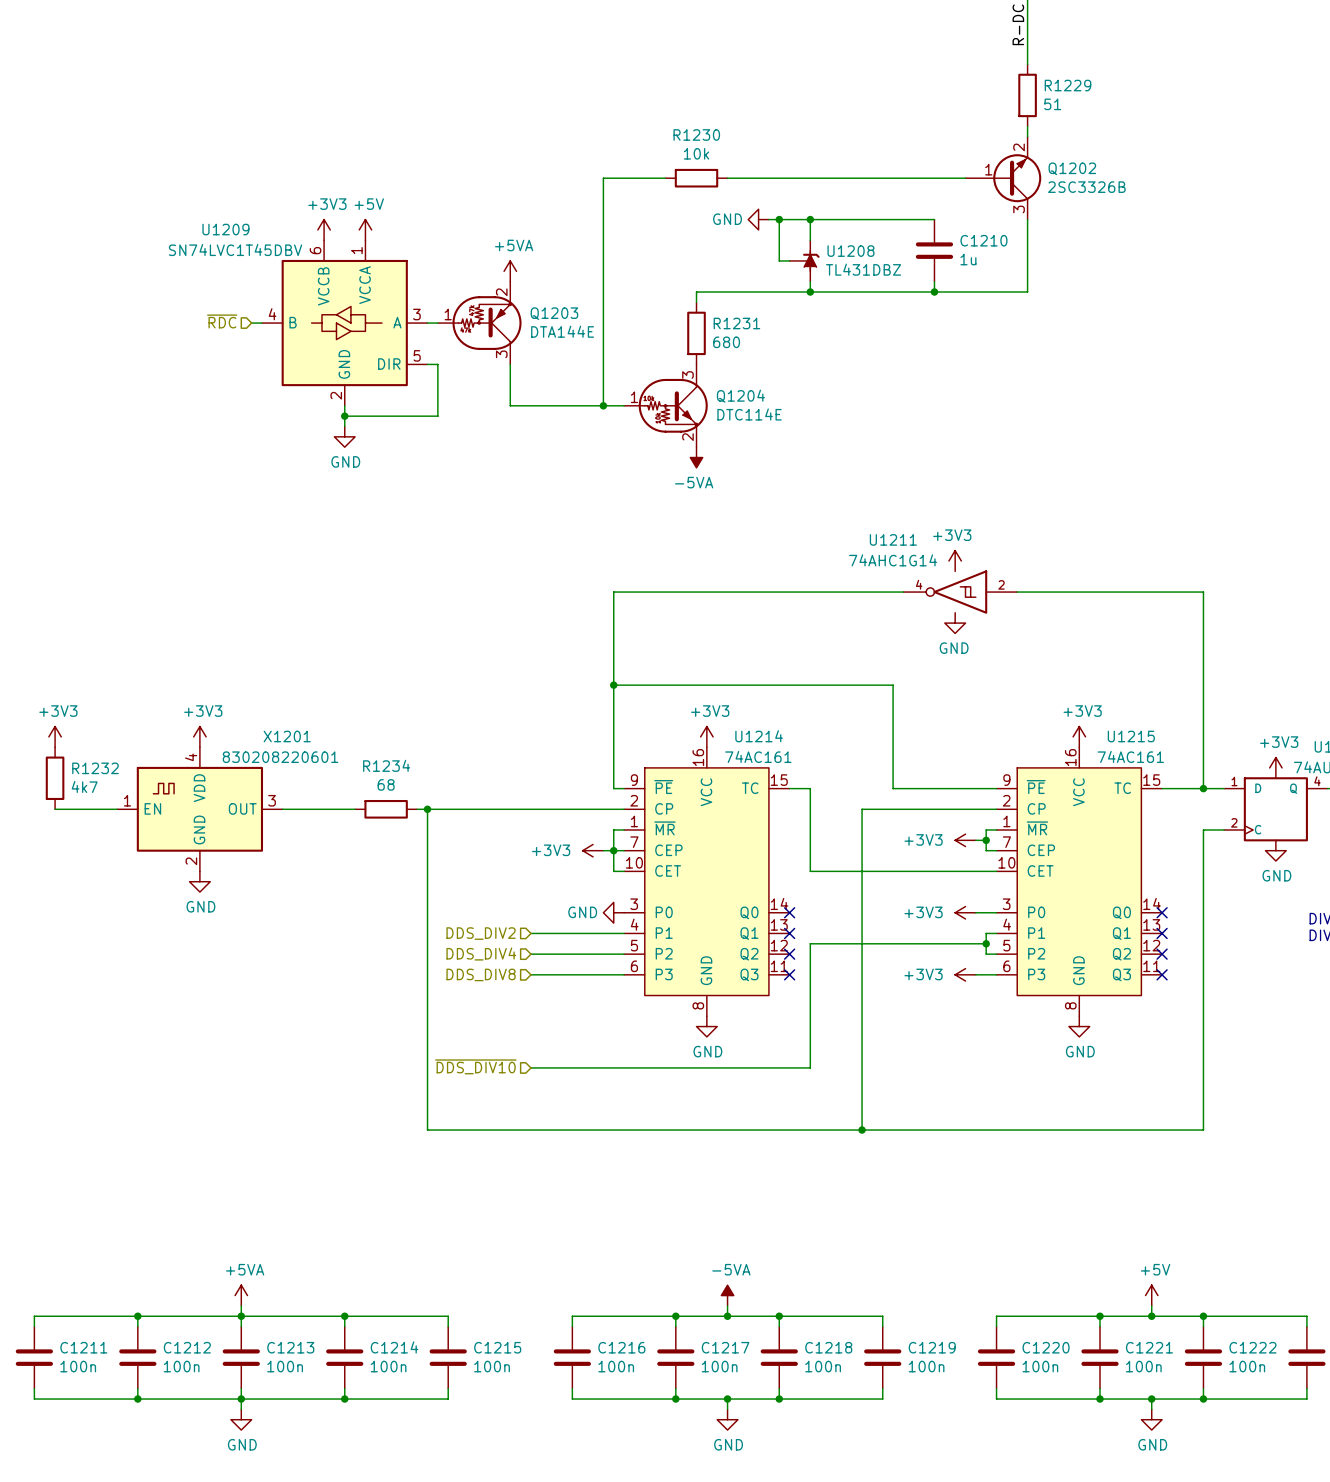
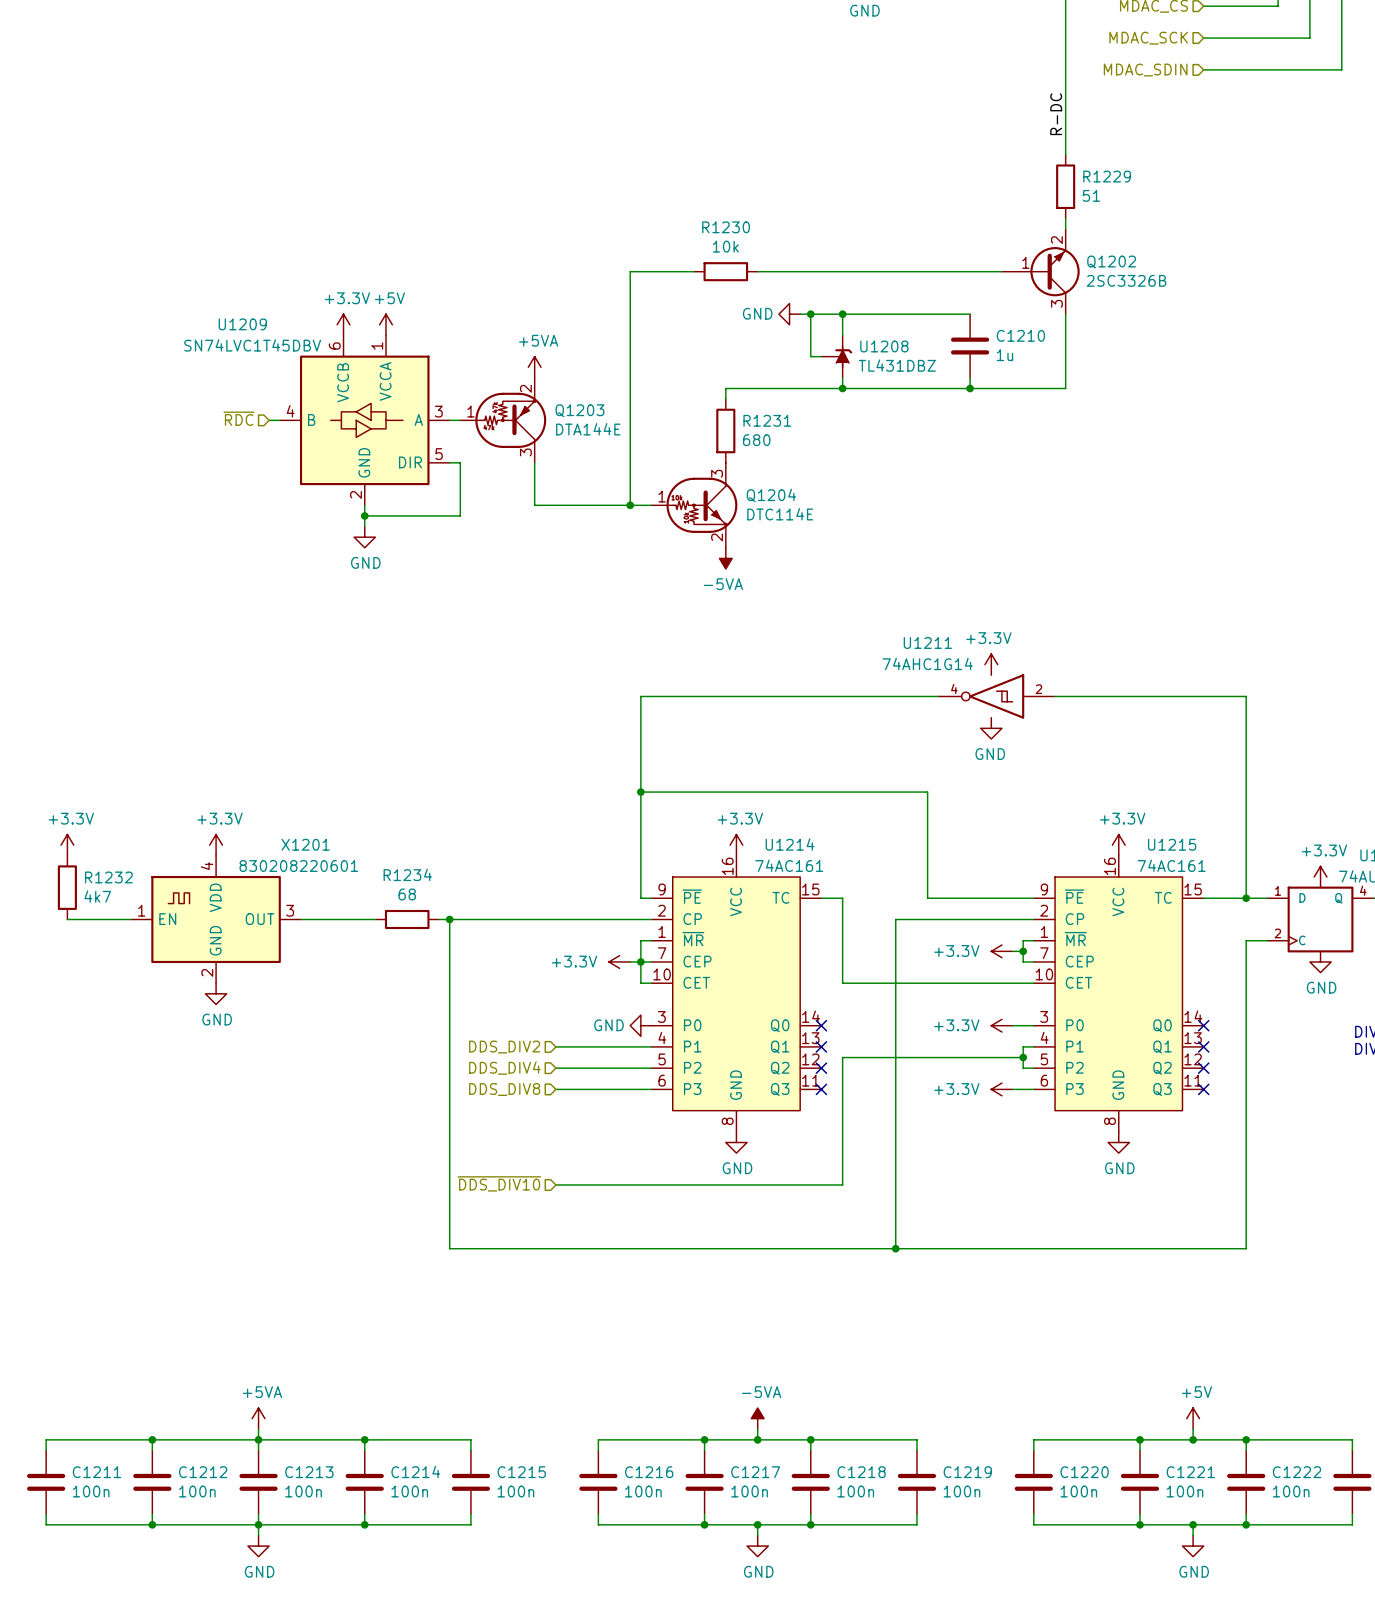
power symbol: +3V3 (324, 229) -> +3.3V (343, 324)
power symbol: +3V3 (955, 561) -> +3.3V (991, 664)
power symbol: +3V3 (55, 736) -> +3.3V (67, 845)
power symbol: +3V3 (199, 736) -> +3.3V (216, 845)
power symbol: +3V3 (706, 736) -> +3.3V (736, 845)
power symbol: +3V3 (1079, 736) -> +3.3V (1118, 845)
power symbol: +3V3 (1275, 767) -> +3.3V (1320, 877)
power symbol: +3V3 (965, 840) -> +3.3V (1001, 951)
power symbol: +3V3 (593, 850) -> +3.3V (619, 961)
power symbol: +3V3 (965, 912) -> +3.3V (1001, 1025)
power symbol: +3V3 (965, 974) -> +3.3V (1001, 1089)

